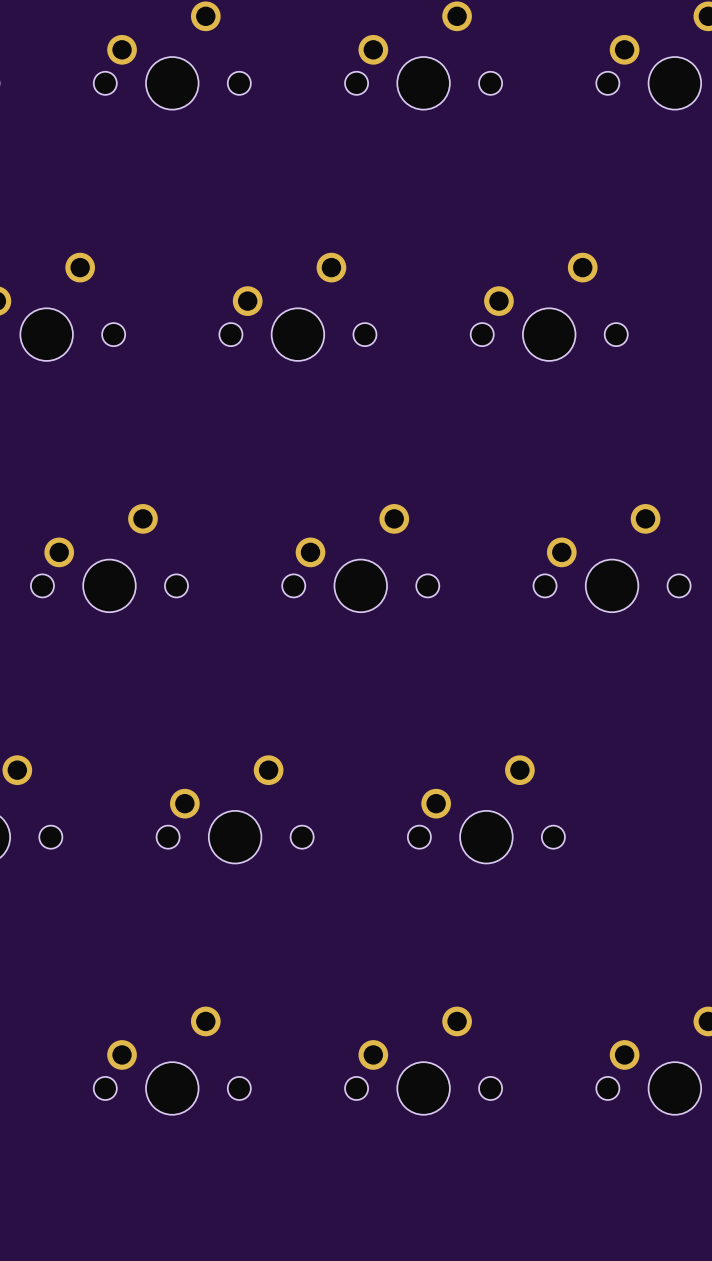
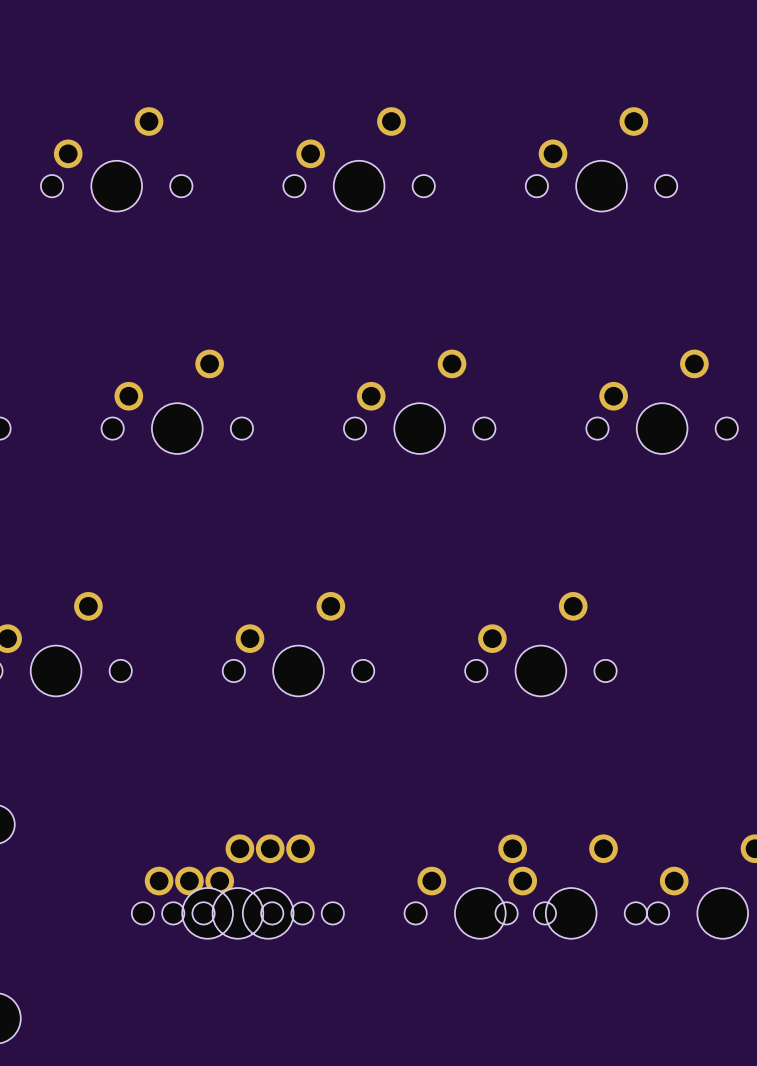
part: none -> (207, 886)
part: none -> (268, 886)
part: none -> (571, 886)

